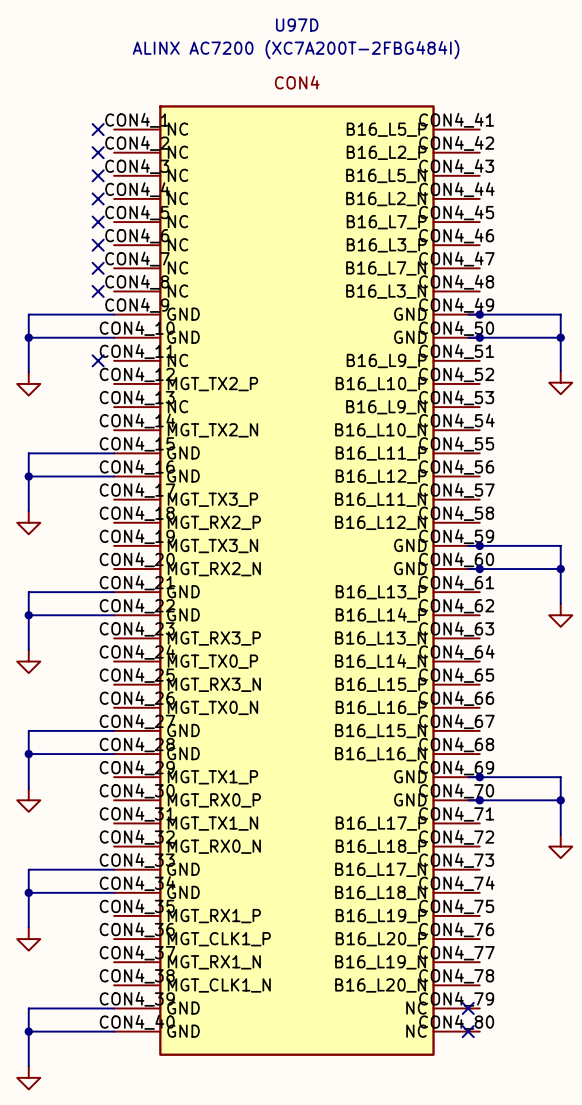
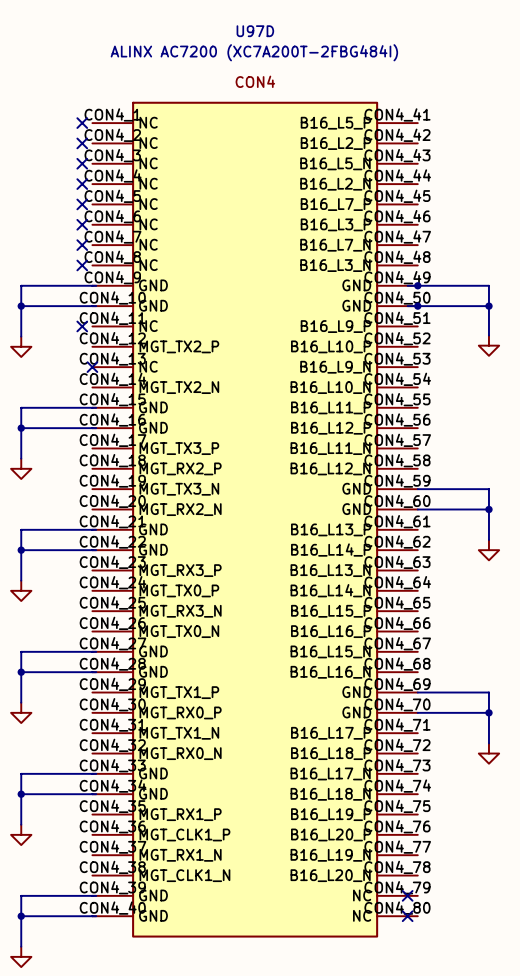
U97D symbol: [114, 105, 480, 1056] -> [92, 101, 418, 938]
no-connect mark: none -> (92, 367)
junction: (479, 545) -> none
junction: (479, 569) -> none
junction: (479, 777) -> none
junction: (479, 800) -> none

